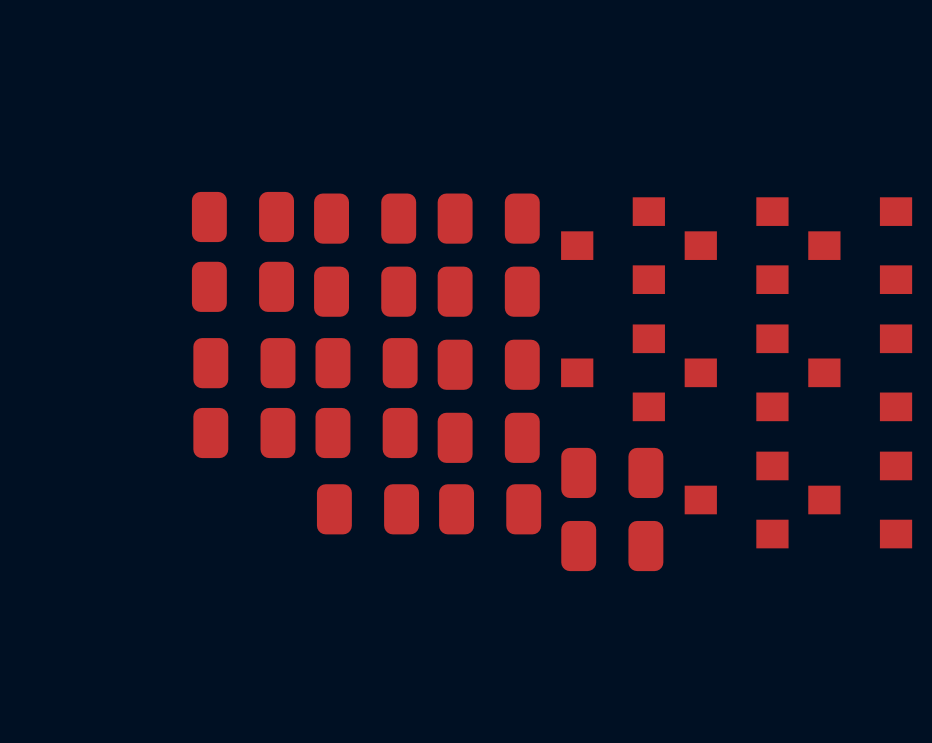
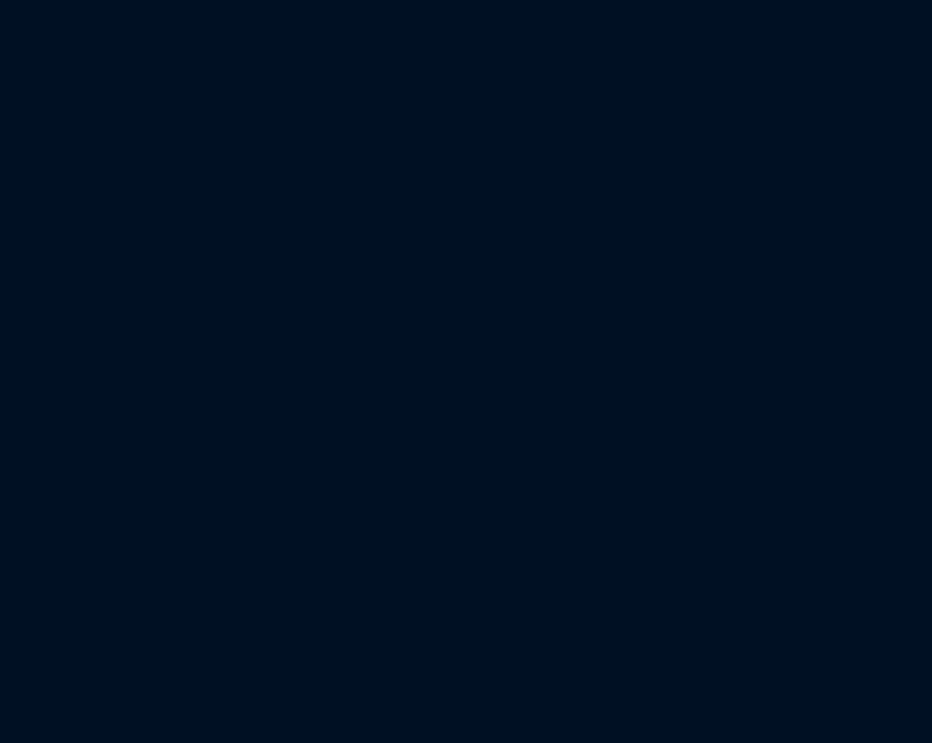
part: (242, 216) -> none
part: (365, 218) -> none
part: (488, 218) -> none
part: (613, 245) -> none
part: (736, 245) -> none
part: (860, 245) -> none
part: (242, 286) -> none
part: (365, 291) -> none
part: (488, 291) -> none
part: (244, 363) -> none
part: (366, 363) -> none
part: (488, 364) -> none
part: (613, 372) -> none
part: (736, 372) -> none
part: (860, 372) -> none
part: (244, 433) -> none
part: (366, 433) -> none
part: (488, 437) -> none
part: (612, 472) -> none
part: (736, 499) -> none
part: (860, 499) -> none
part: (367, 509) -> none
part: (490, 509) -> none
part: (612, 546) -> none

